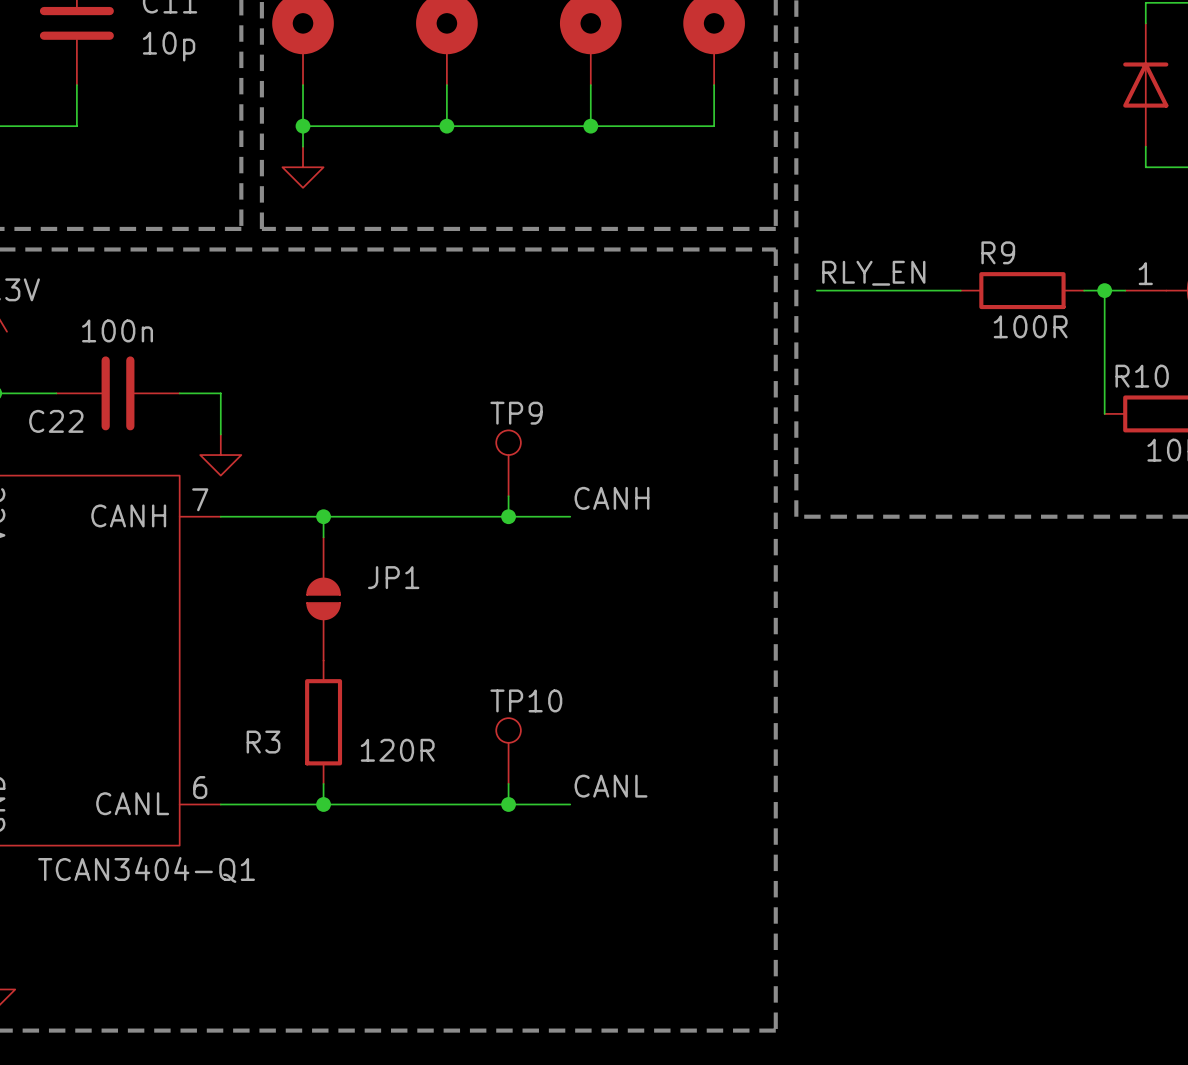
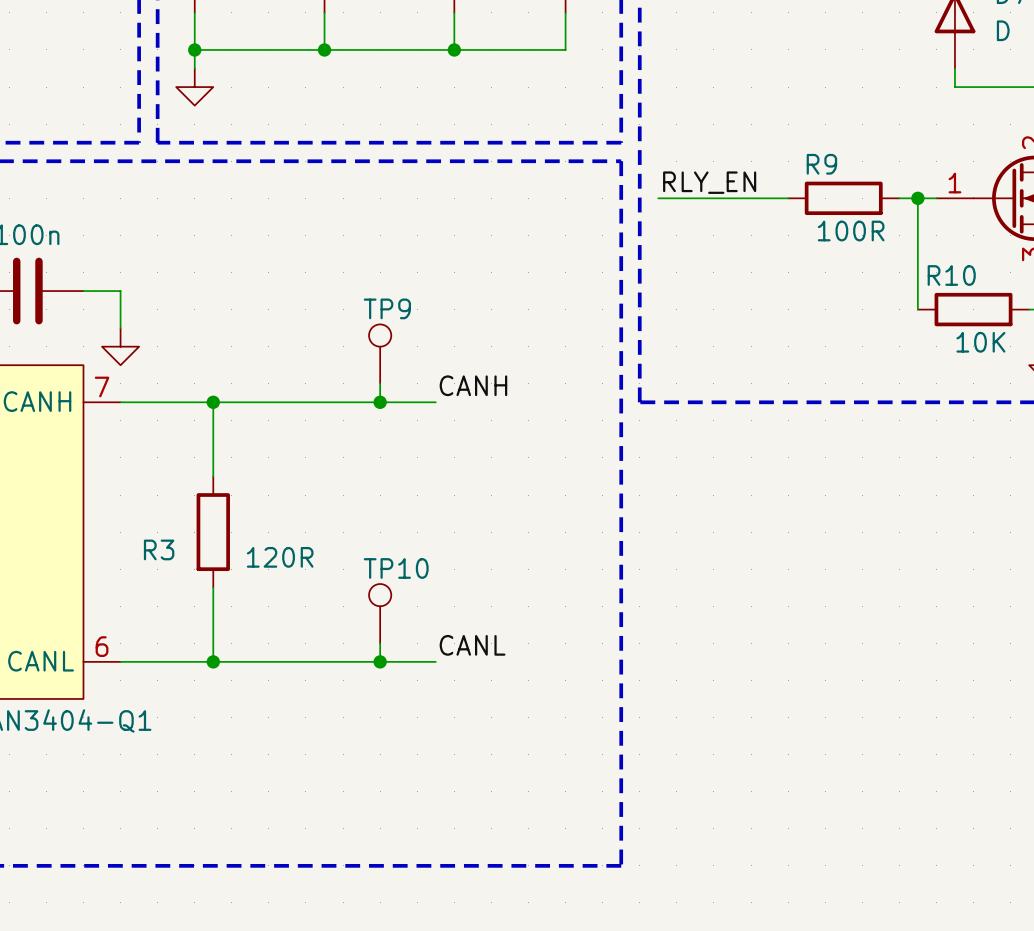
JP1: (323, 598) -> none
wire: none -> (213, 587) (213, 643)
R3 position: (323, 722) -> (213, 532)

